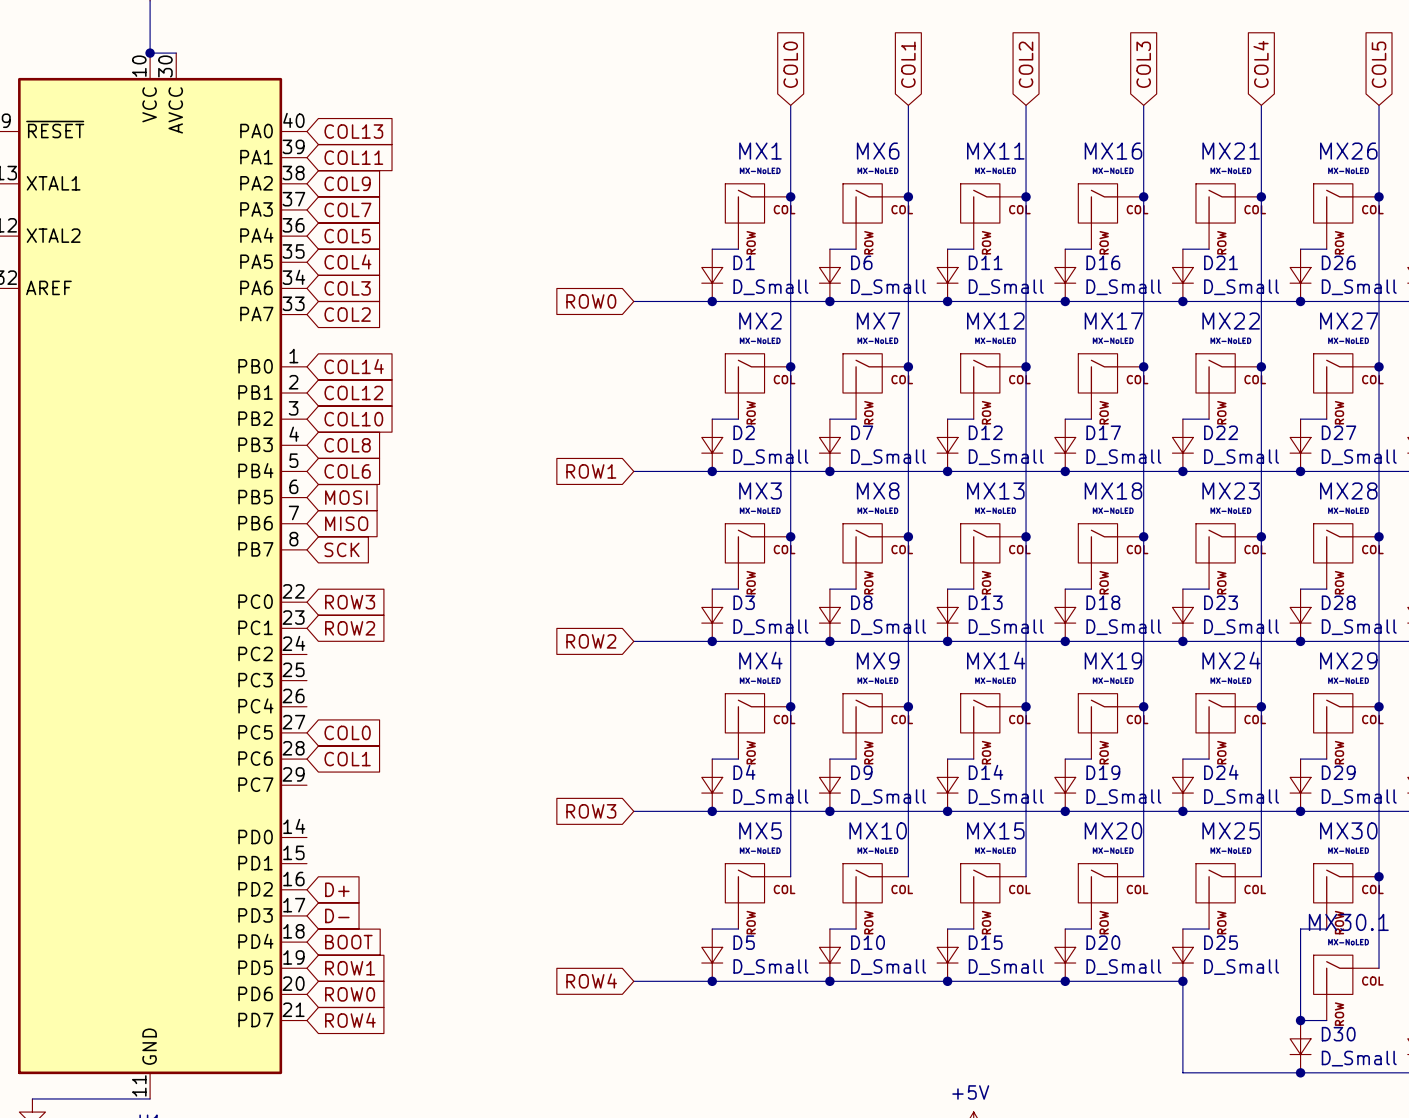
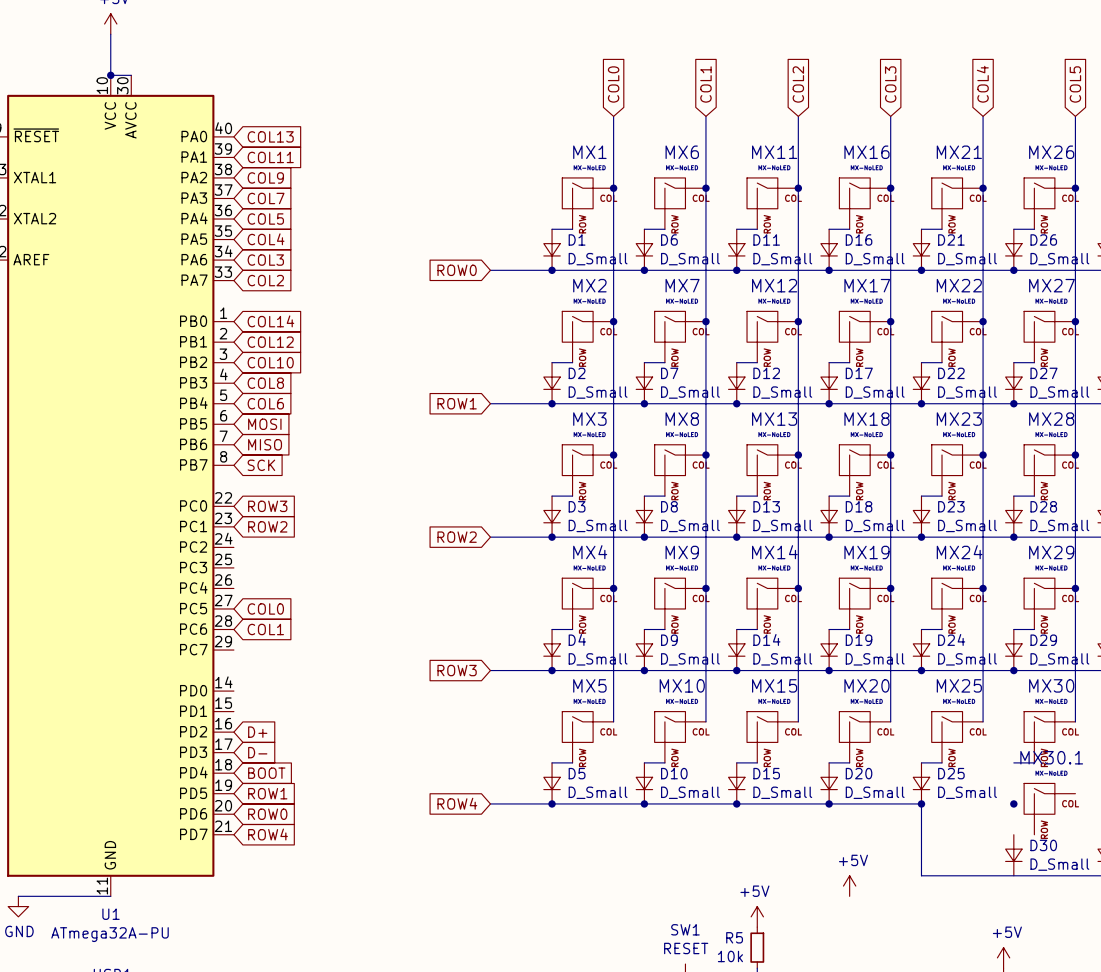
wire: (1379, 876) (1379, 968) -> none
junction: (1379, 876) -> none
wire: (1300, 929) (1300, 1020) (1326, 1020) -> none
junction position: (1300, 1020) -> (1013, 803)
junction: (1300, 1072) -> none
power symbol: none -> +5V (849, 886)

